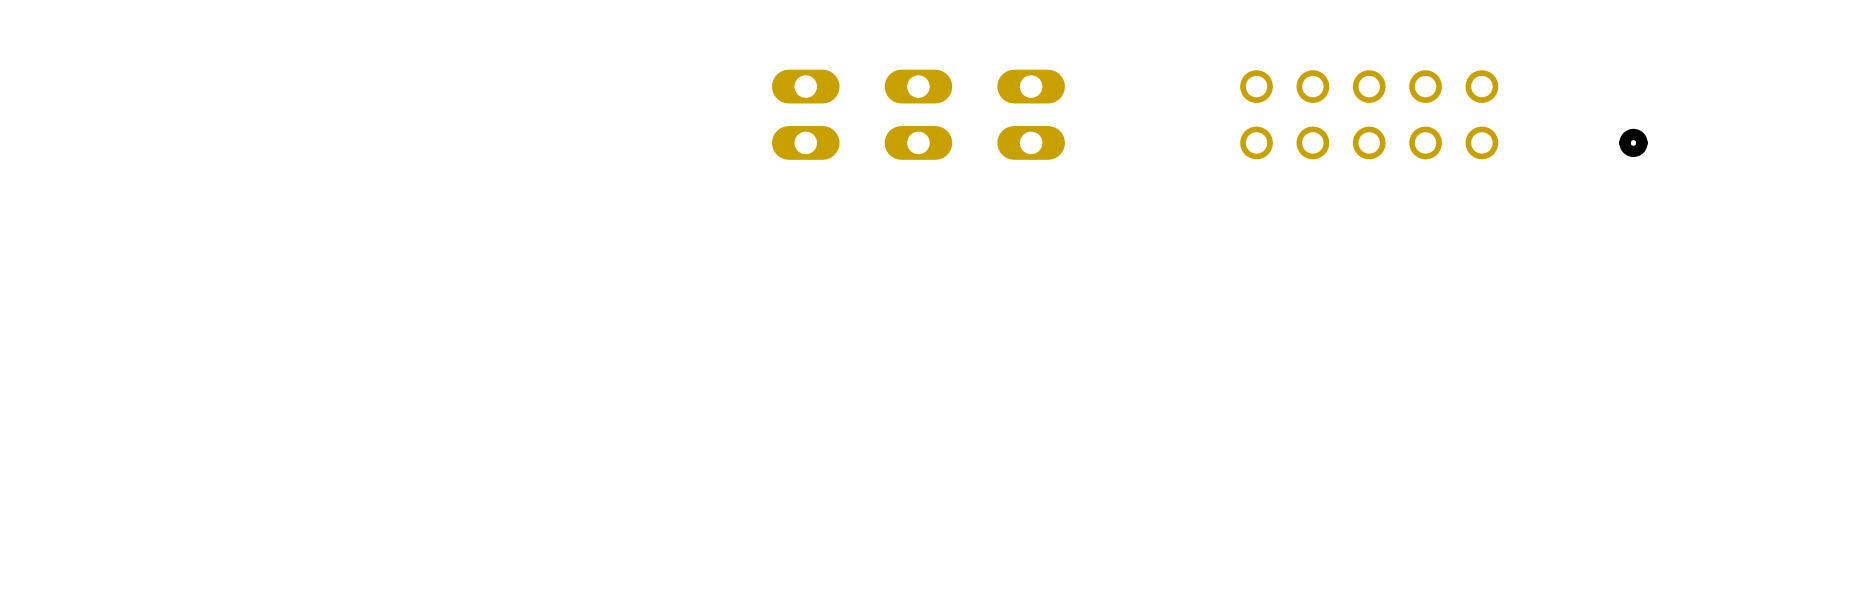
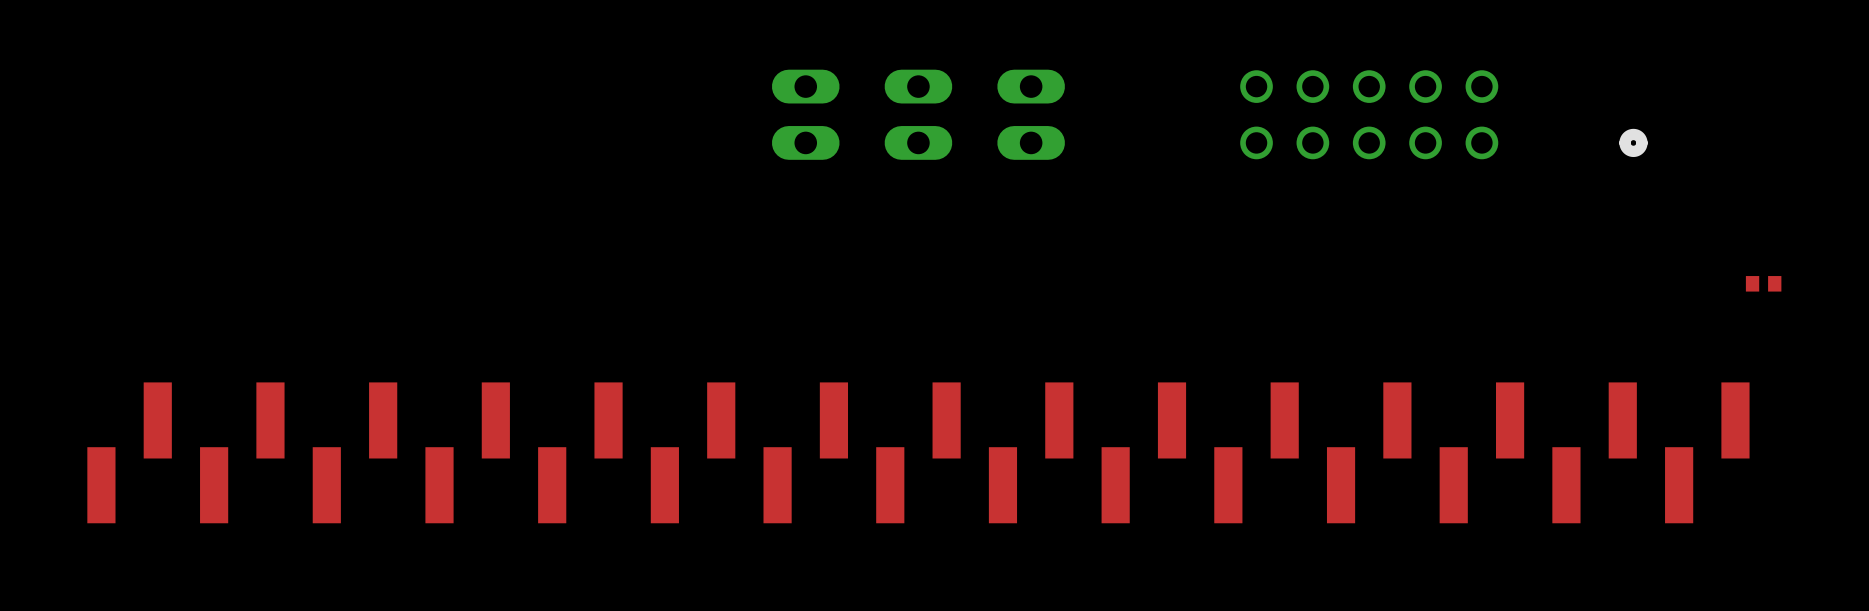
part: none -> (1763, 283)
part: none -> (918, 452)

